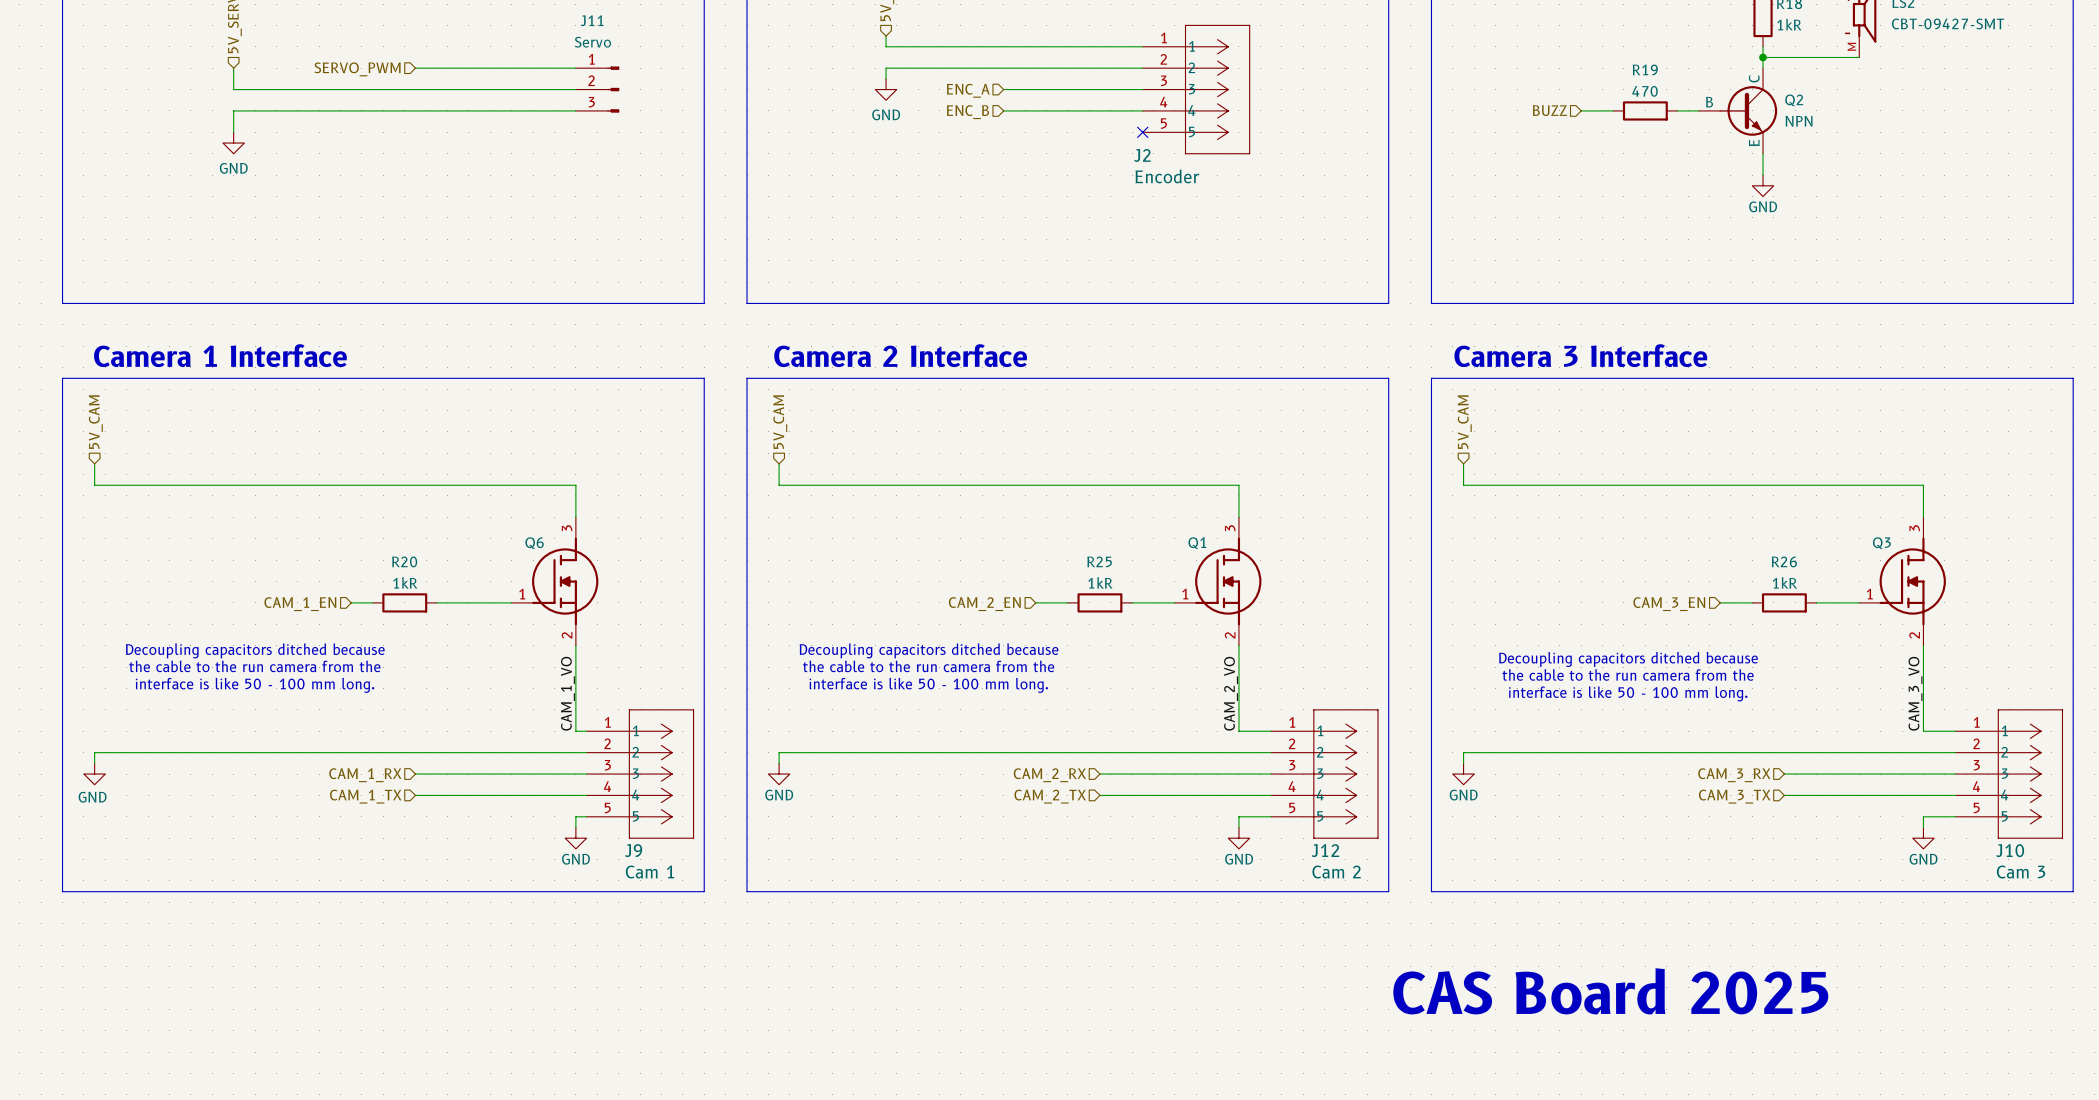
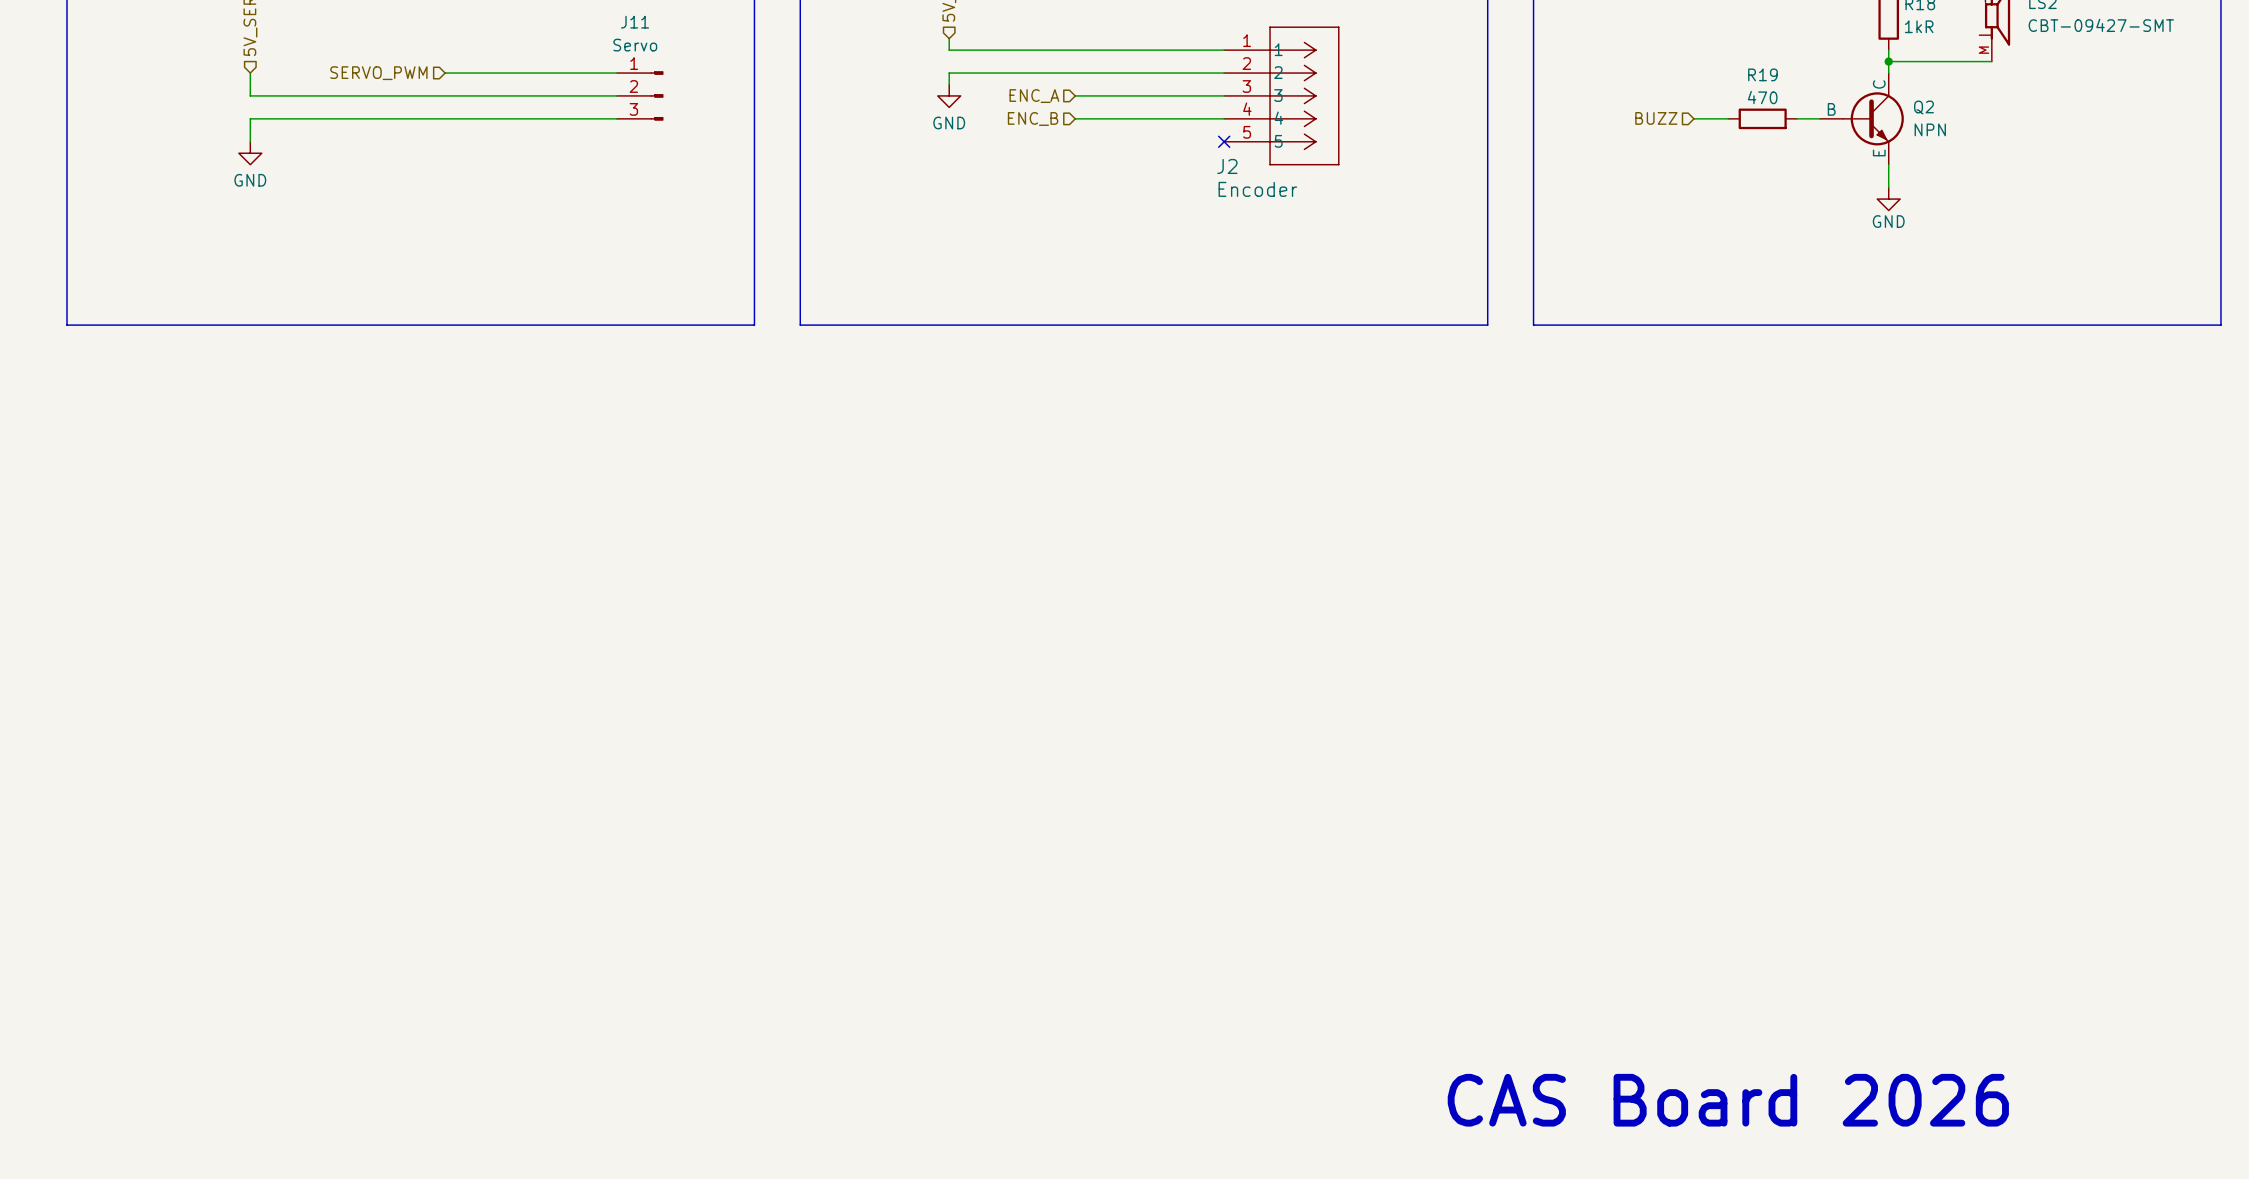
text: Camera 1 Interface (220, 355) -> none
text: Camera 2 Interface (900, 355) -> none
text: Camera 3 Interface (1580, 355) -> none
line: (62, 378) (62, 891) (704, 891) (704, 378) (62, 378) -> none
line: (747, 378) (1388, 378) (1388, 891) (747, 891) (747, 378) -> none
line: (1431, 378) (2073, 378) (2073, 891) (1431, 891) (1431, 378) -> none
hierarchical label: 5V_CAM (95, 422) -> none
hierarchical label: 5V_CAM (780, 422) -> none
hierarchical label: 5V_CAM (1464, 422) -> none
wire: (94, 463) (94, 485) (575, 485) (575, 517) -> none
wire: (779, 463) (779, 485) (1238, 485) (1238, 517) -> none
wire: (1463, 463) (1463, 485) (1923, 485) (1923, 517) -> none
Q6: (555, 581) -> none
Q1: (1218, 581) -> none
Q3: (1902, 581) -> none
wire: (351, 602) (372, 602) -> none
R20: 1kR (404, 602) -> none
wire: (436, 602) (511, 602) -> none
wire: (1035, 602) (1067, 602) -> none
R25: 1kR (1099, 602) -> none
wire: (1132, 602) (1174, 602) -> none
wire: (1720, 602) (1752, 602) -> none
R26: 1kR (1784, 602) -> none
wire: (1816, 602) (1859, 602) -> none
hierarchical label: CAM_1_EN (300, 604) -> none
hierarchical label: CAM_2_EN (984, 604) -> none
hierarchical label: CAM_3_EN (1669, 604) -> none
wire: (575, 645) (575, 731) (586, 731) -> none
wire: (1238, 645) (1238, 731) (1271, 731) -> none
wire: (1923, 645) (1923, 731) (1955, 731) -> none
text: Decoupling capacitors ditched because (255, 650) -> none
text: Decoupling capacitors ditched because (929, 650) -> none
text: Decoupling capacitors ditched because (1628, 659) -> none
text: the cable to the run camera from the (254, 666) -> none
text: the cable to the run camera from the (928, 666) -> none
text: the cable to the run camera from the (1628, 674) -> none
text: interface is like 50 - 100 mm long. (255, 685) -> none
text: interface is like 50 - 100 mm long. (928, 685) -> none
label: CAM_1_VO (567, 693) -> none
label: CAM_2_VO (1231, 693) -> none
text: interface is like 50 - 100 mm long. (1628, 693) -> none
label: CAM_3_VO (1915, 693) -> none
wire: (586, 752) (94, 752) (94, 763) -> none
wire: (1271, 752) (779, 752) (779, 763) -> none
wire: (1955, 752) (1463, 752) (1463, 763) -> none
power symbol: GND (94, 774) -> none
wire: (415, 774) (586, 774) -> none
J9: Cam 1 (640, 774) -> none
power symbol: GND (779, 774) -> none
wire: (1099, 774) (1271, 774) -> none
J12: Cam 2 (1324, 774) -> none
power symbol: GND (1463, 774) -> none
wire: (1784, 774) (1955, 774) -> none
J10: Cam 3 (2009, 774) -> none
hierarchical label: CAM_1_RX (365, 775) -> none
hierarchical label: CAM_2_RX (1049, 775) -> none
hierarchical label: CAM_3_RX (1734, 775) -> none
wire: (415, 795) (586, 795) -> none
wire: (1099, 795) (1271, 795) -> none
wire: (1784, 795) (1955, 795) -> none
hierarchical label: CAM_1_TX (365, 796) -> none
hierarchical label: CAM_2_TX (1050, 796) -> none
hierarchical label: CAM_3_TX (1734, 796) -> none
wire: (586, 816) (575, 816) (575, 827) -> none
wire: (1271, 816) (1238, 816) (1238, 827) -> none
wire: (1955, 816) (1923, 816) (1923, 827) -> none
power symbol: GND (575, 838) -> none
power symbol: GND (1238, 838) -> none
power symbol: GND (1923, 838) -> none
text: CAS Board 2025 (1610, 991) -> CAS Board 2026 (1728, 1100)

